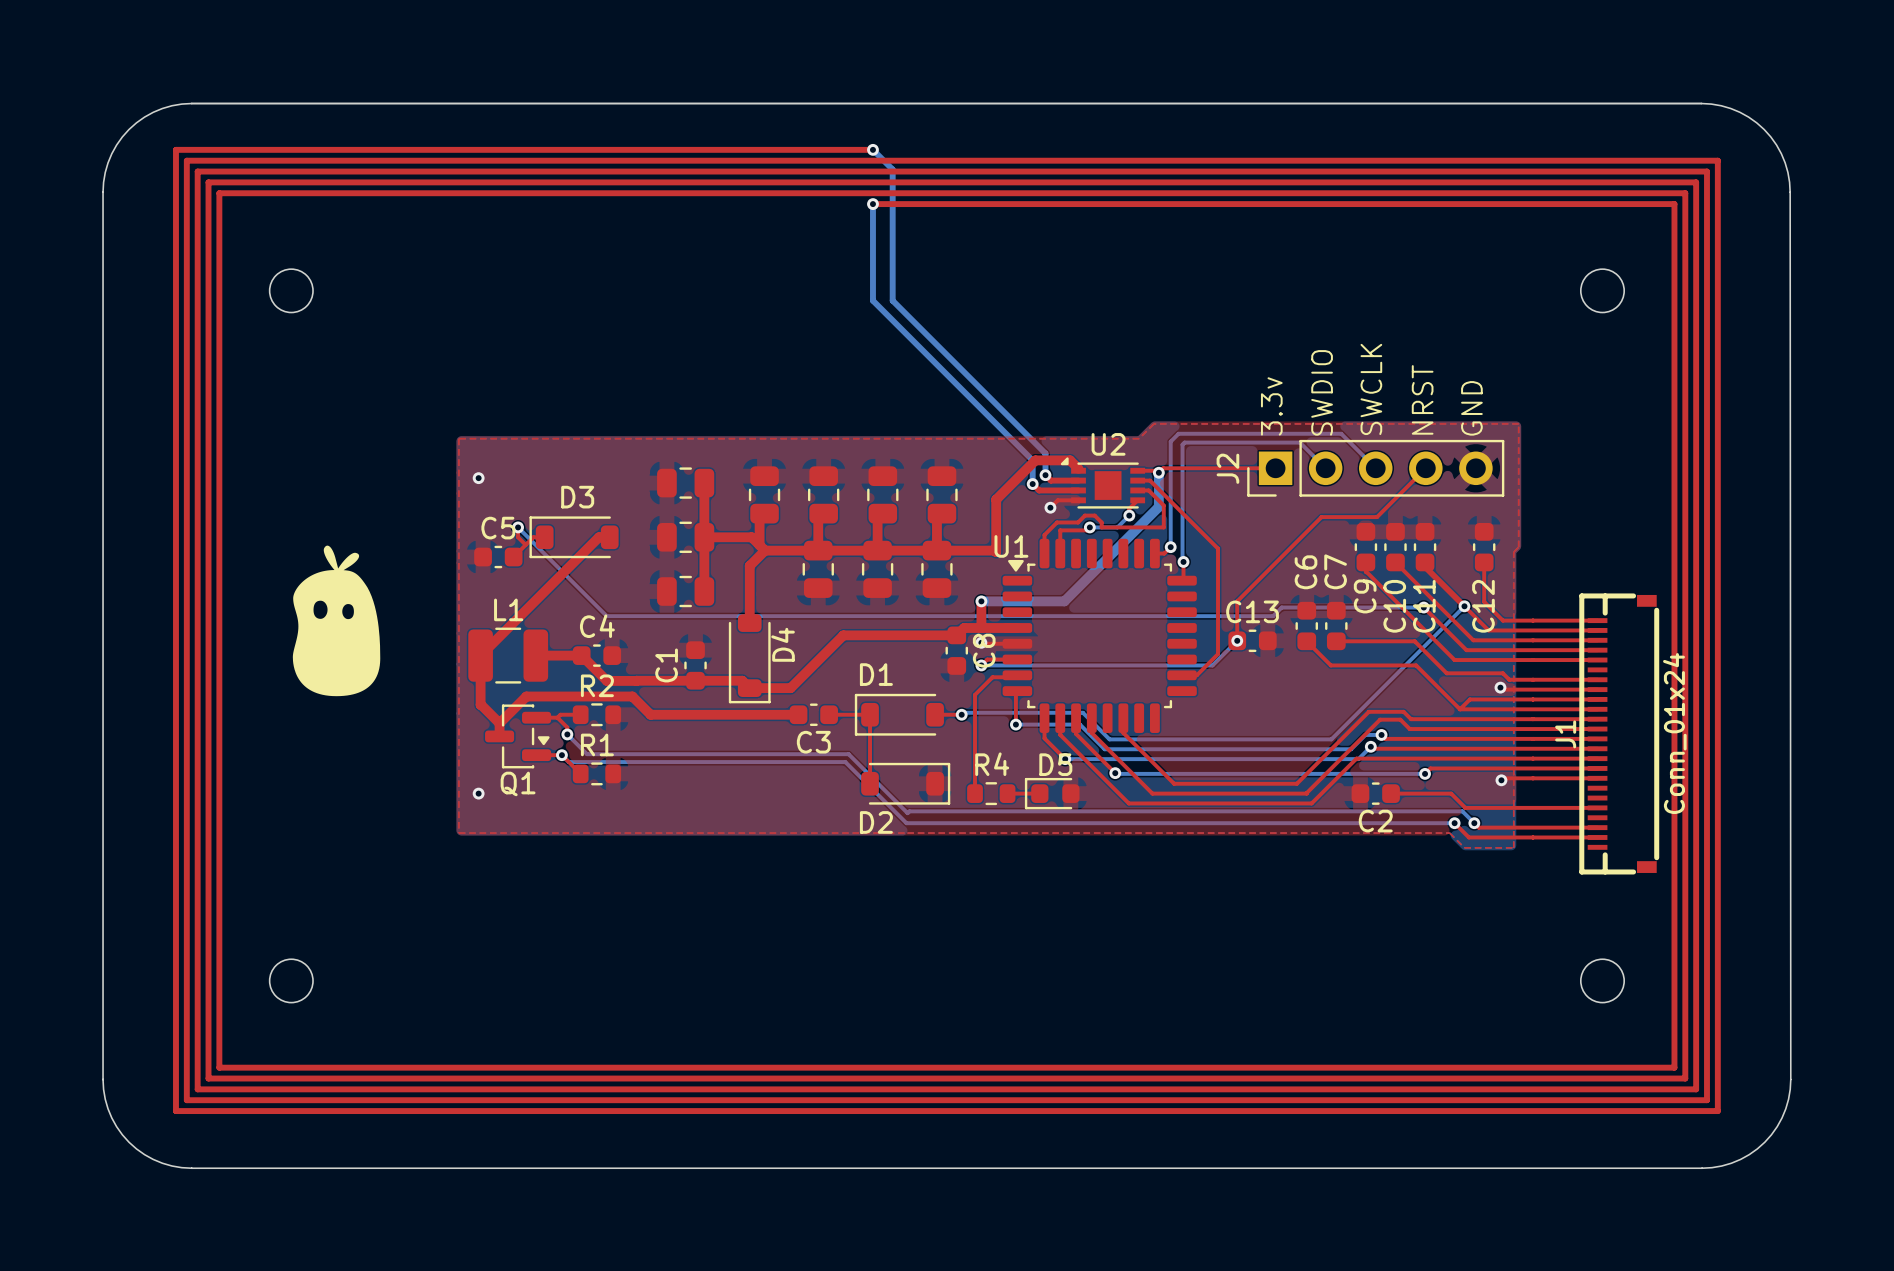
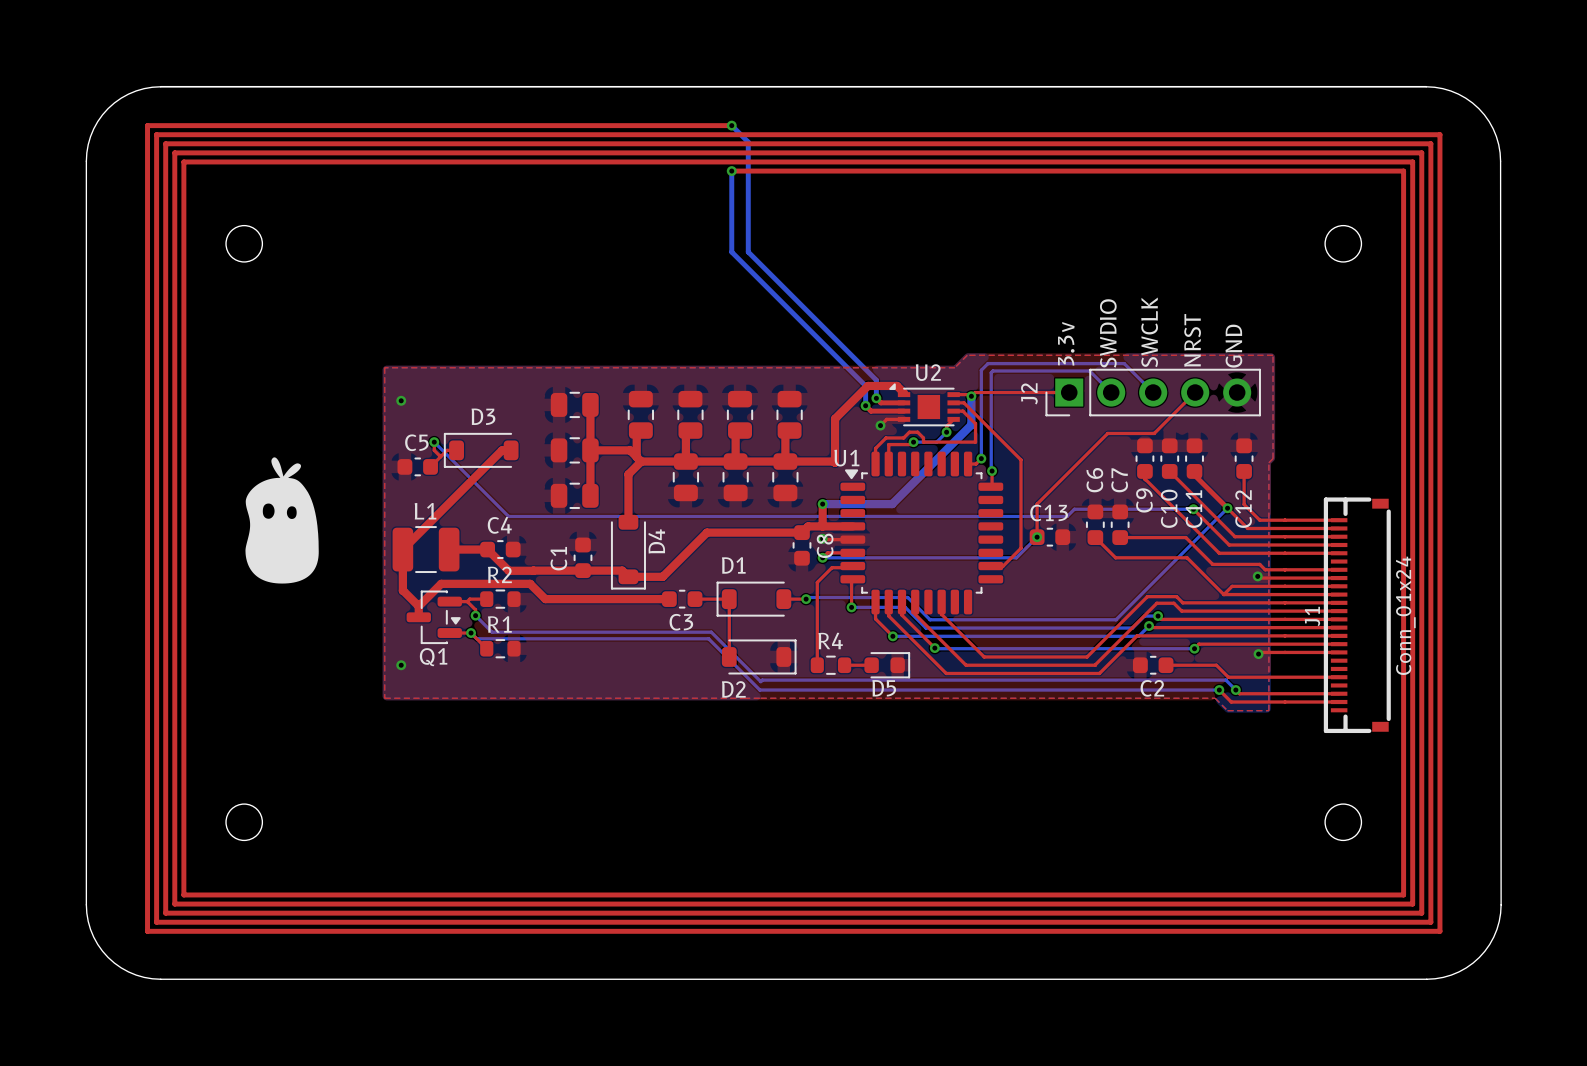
D5 rotation: 0° (1052, 793) -> 180° (887, 665)

